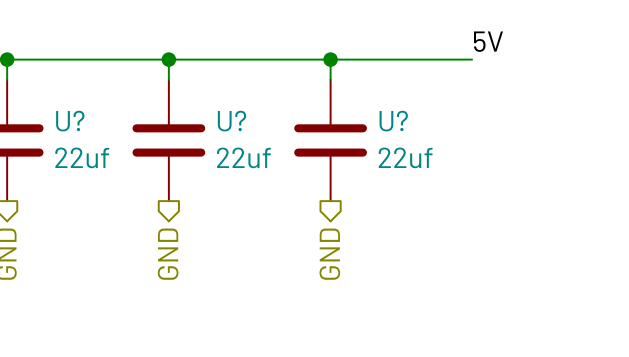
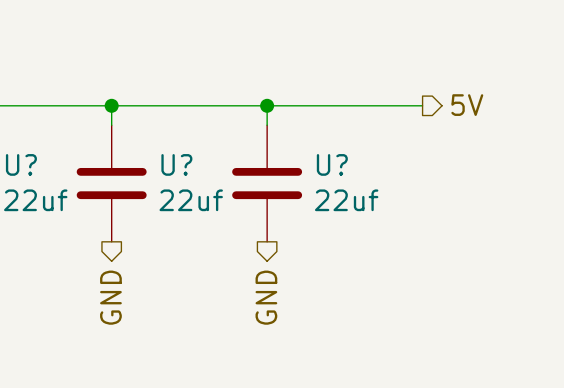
label: 5V (488, 41) -> none
hierarchical label: none -> 5V (467, 105)
wire: none -> (403, 105) (422, 105)

